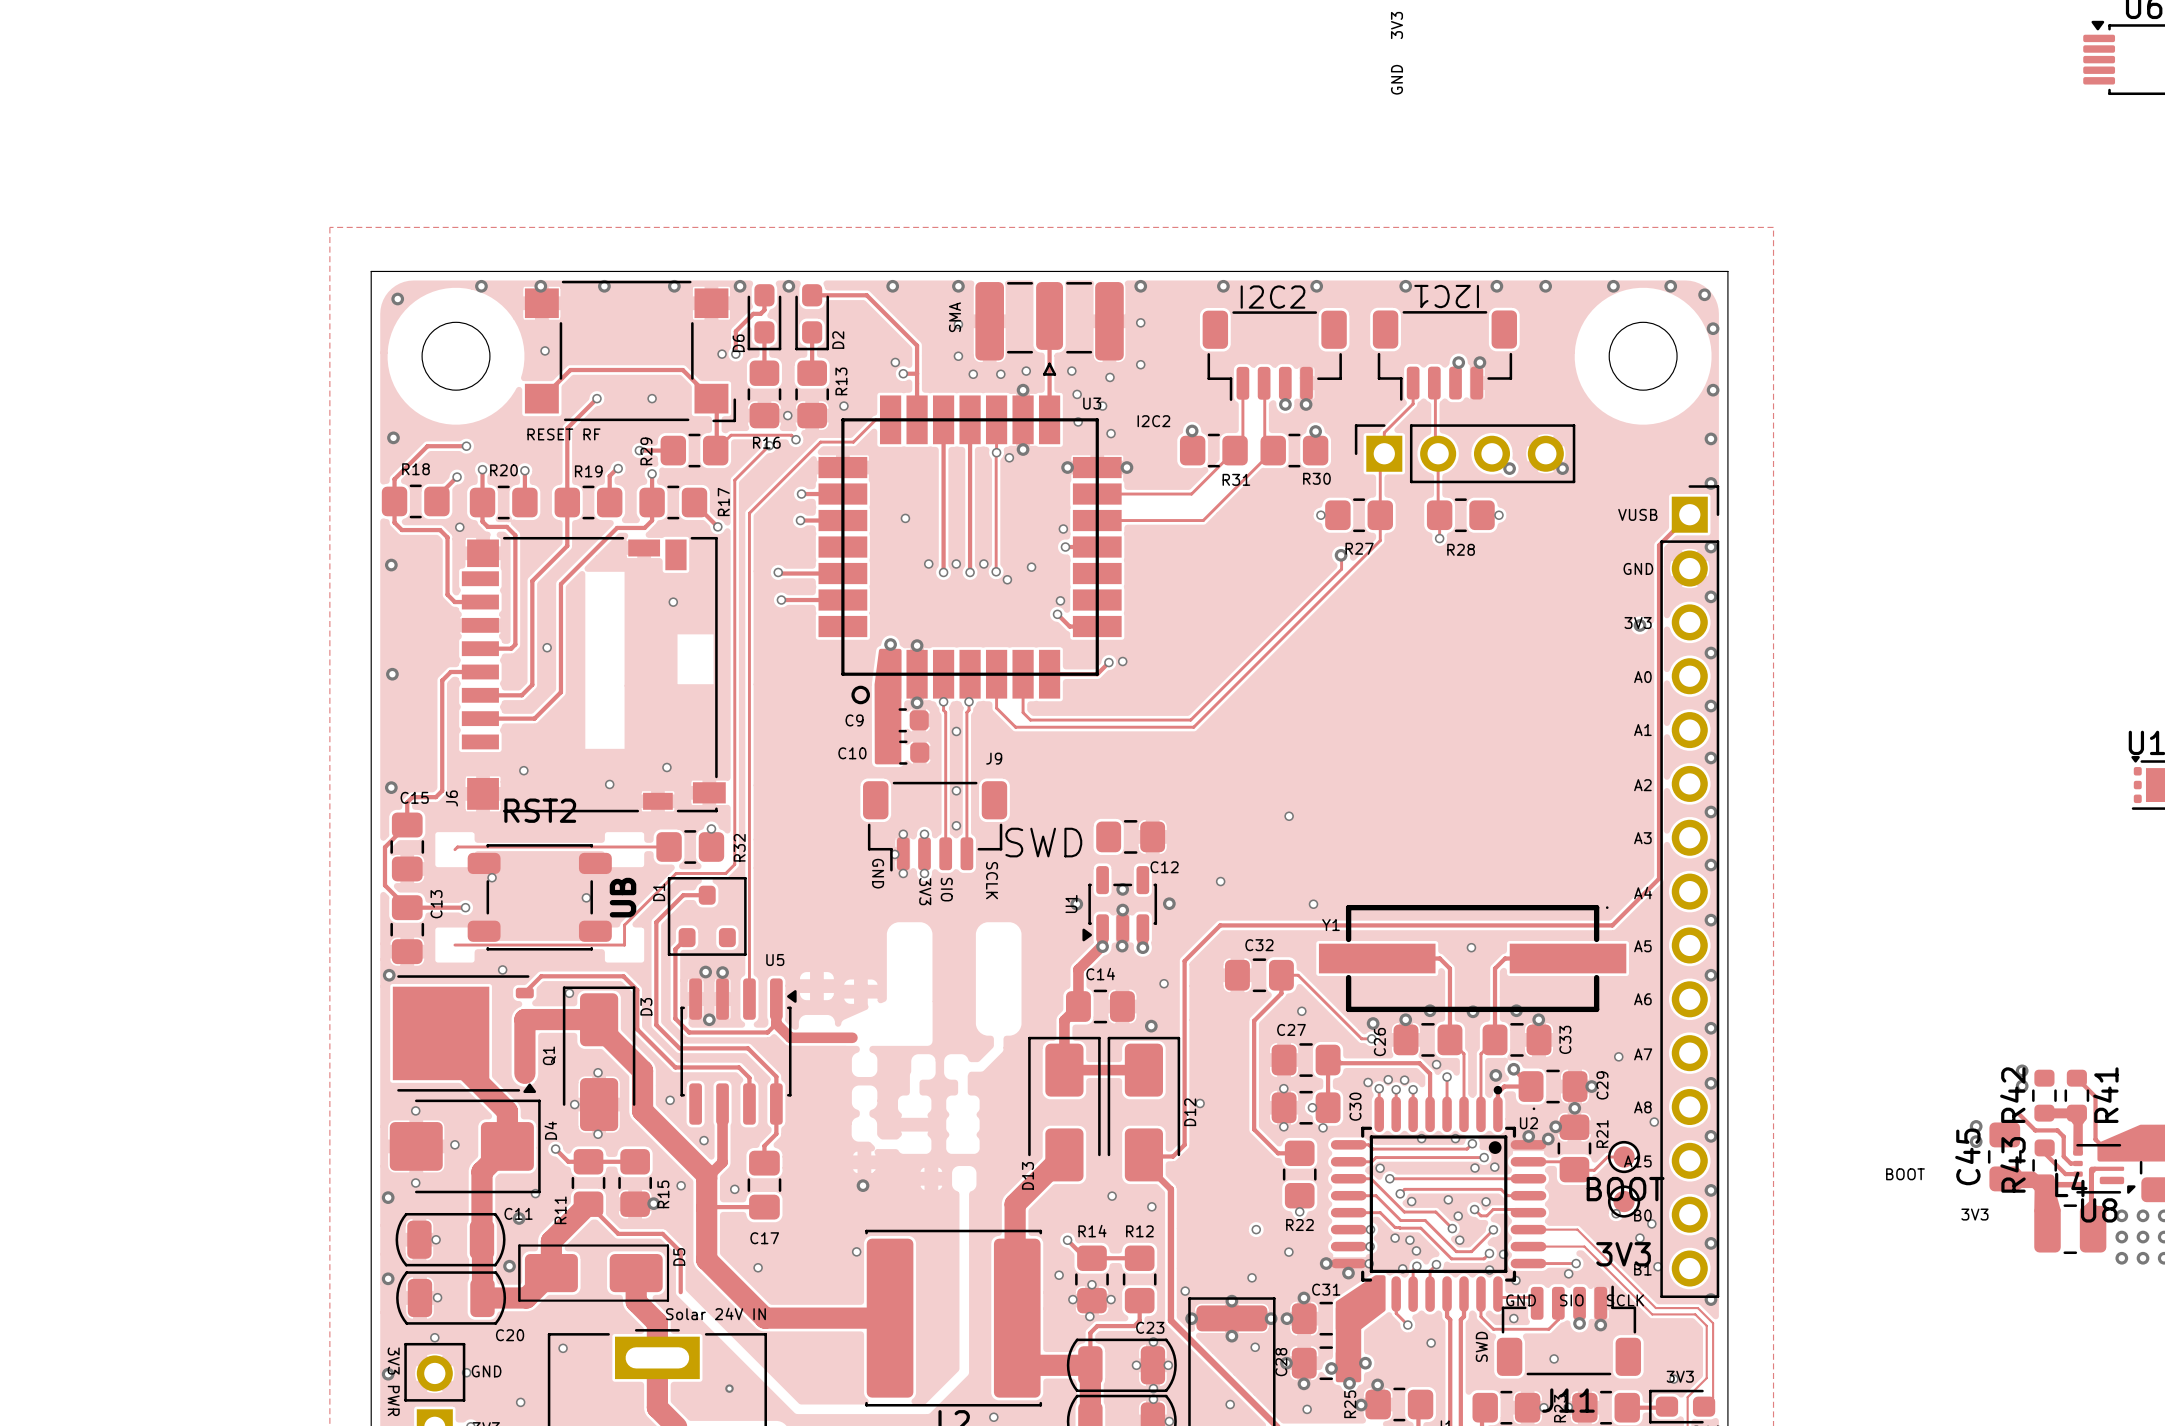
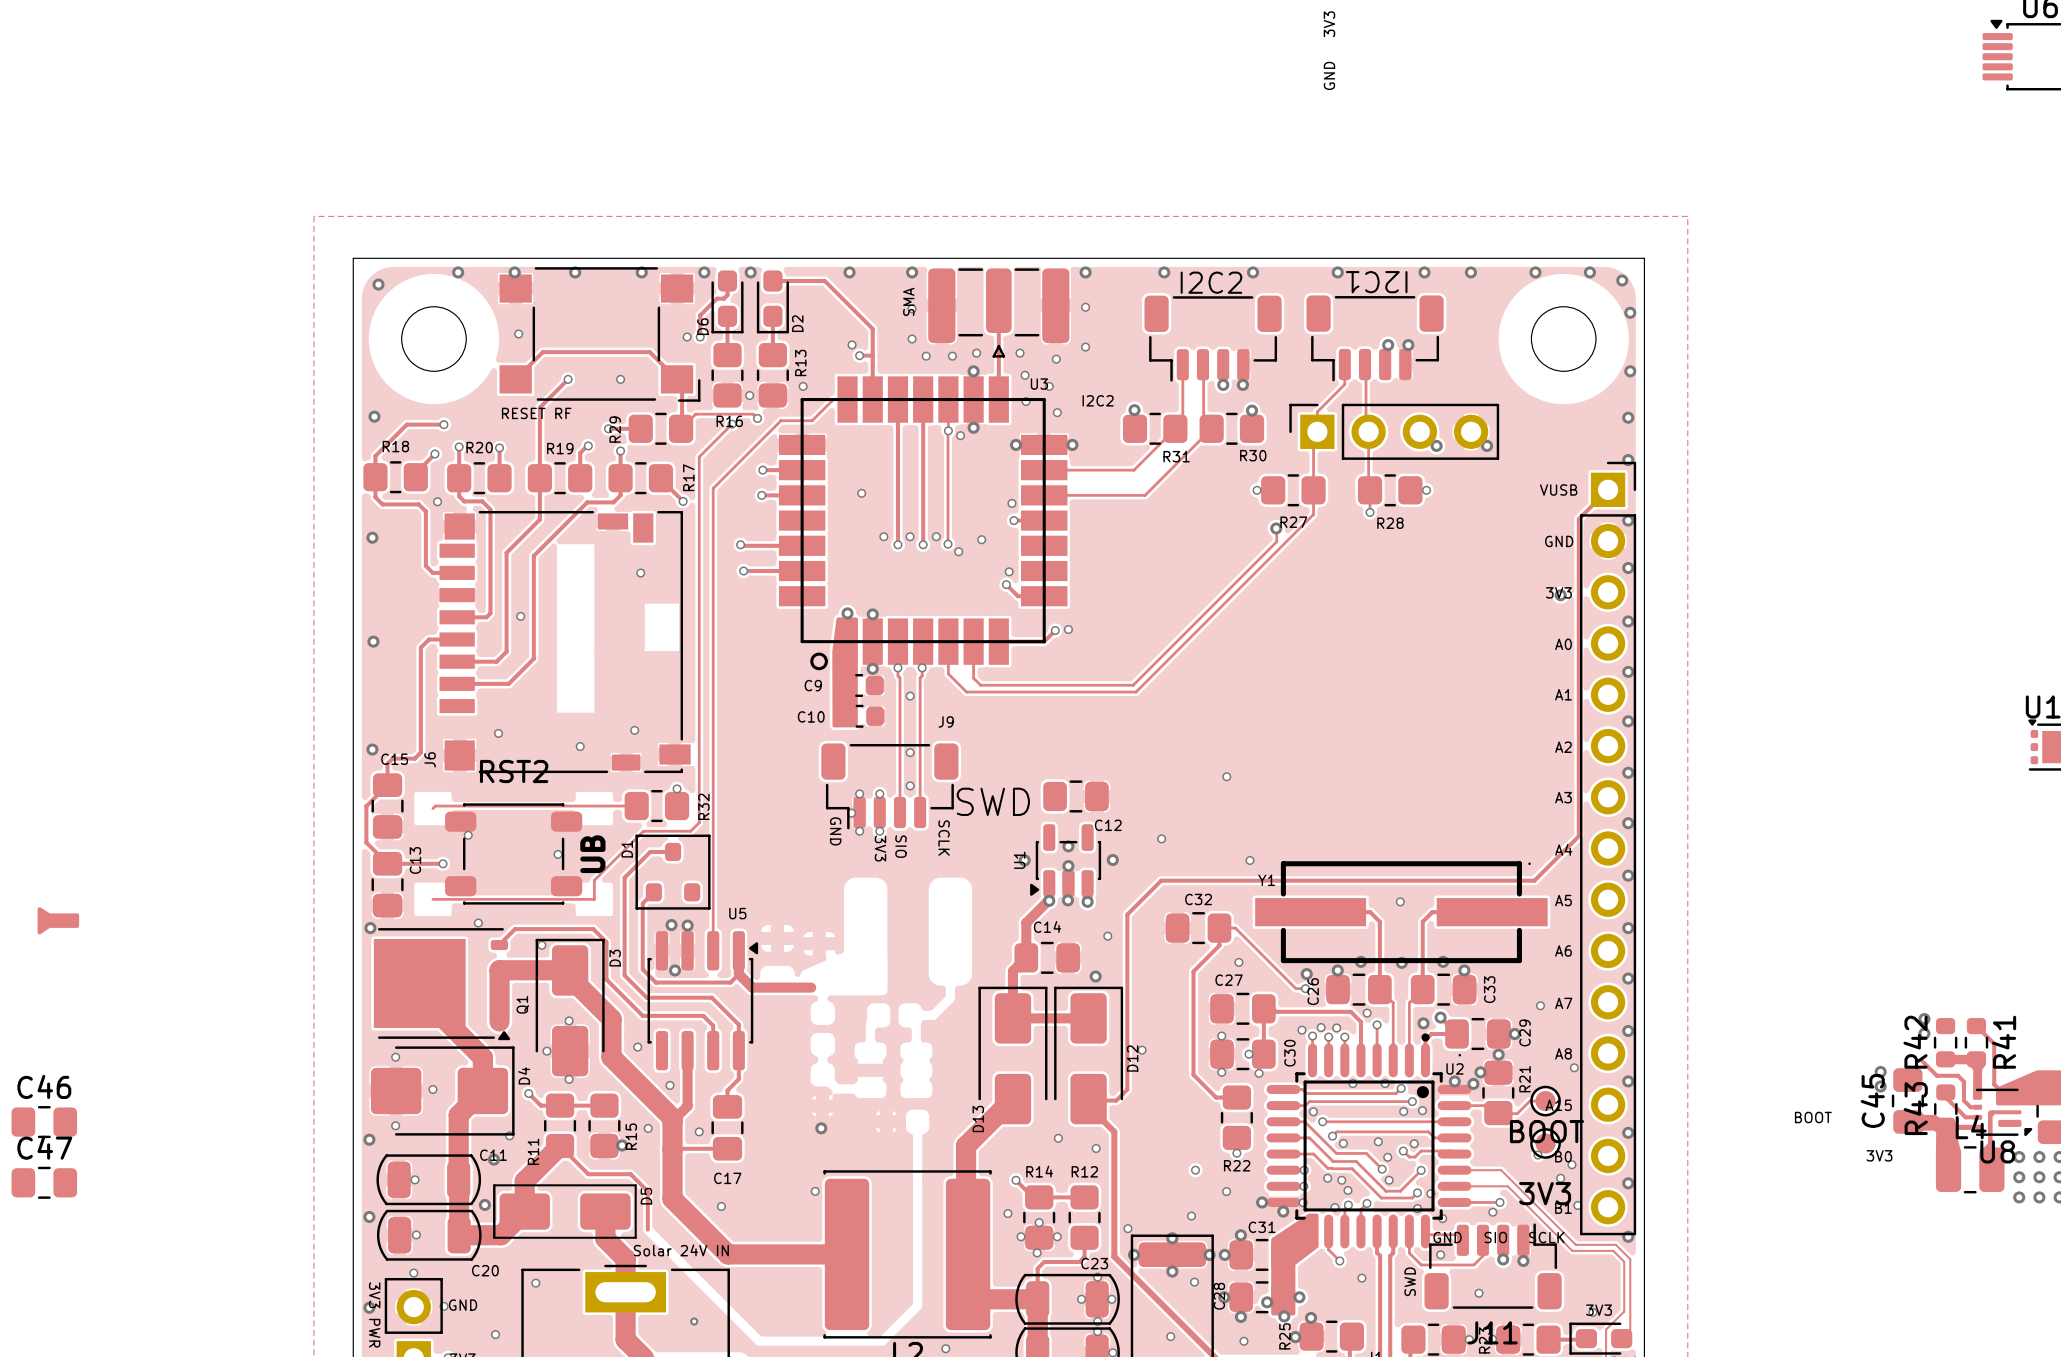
drawing: none -> [37, 907, 80, 935]
C46: none -> (44, 1122)
C47: none -> (44, 1182)

